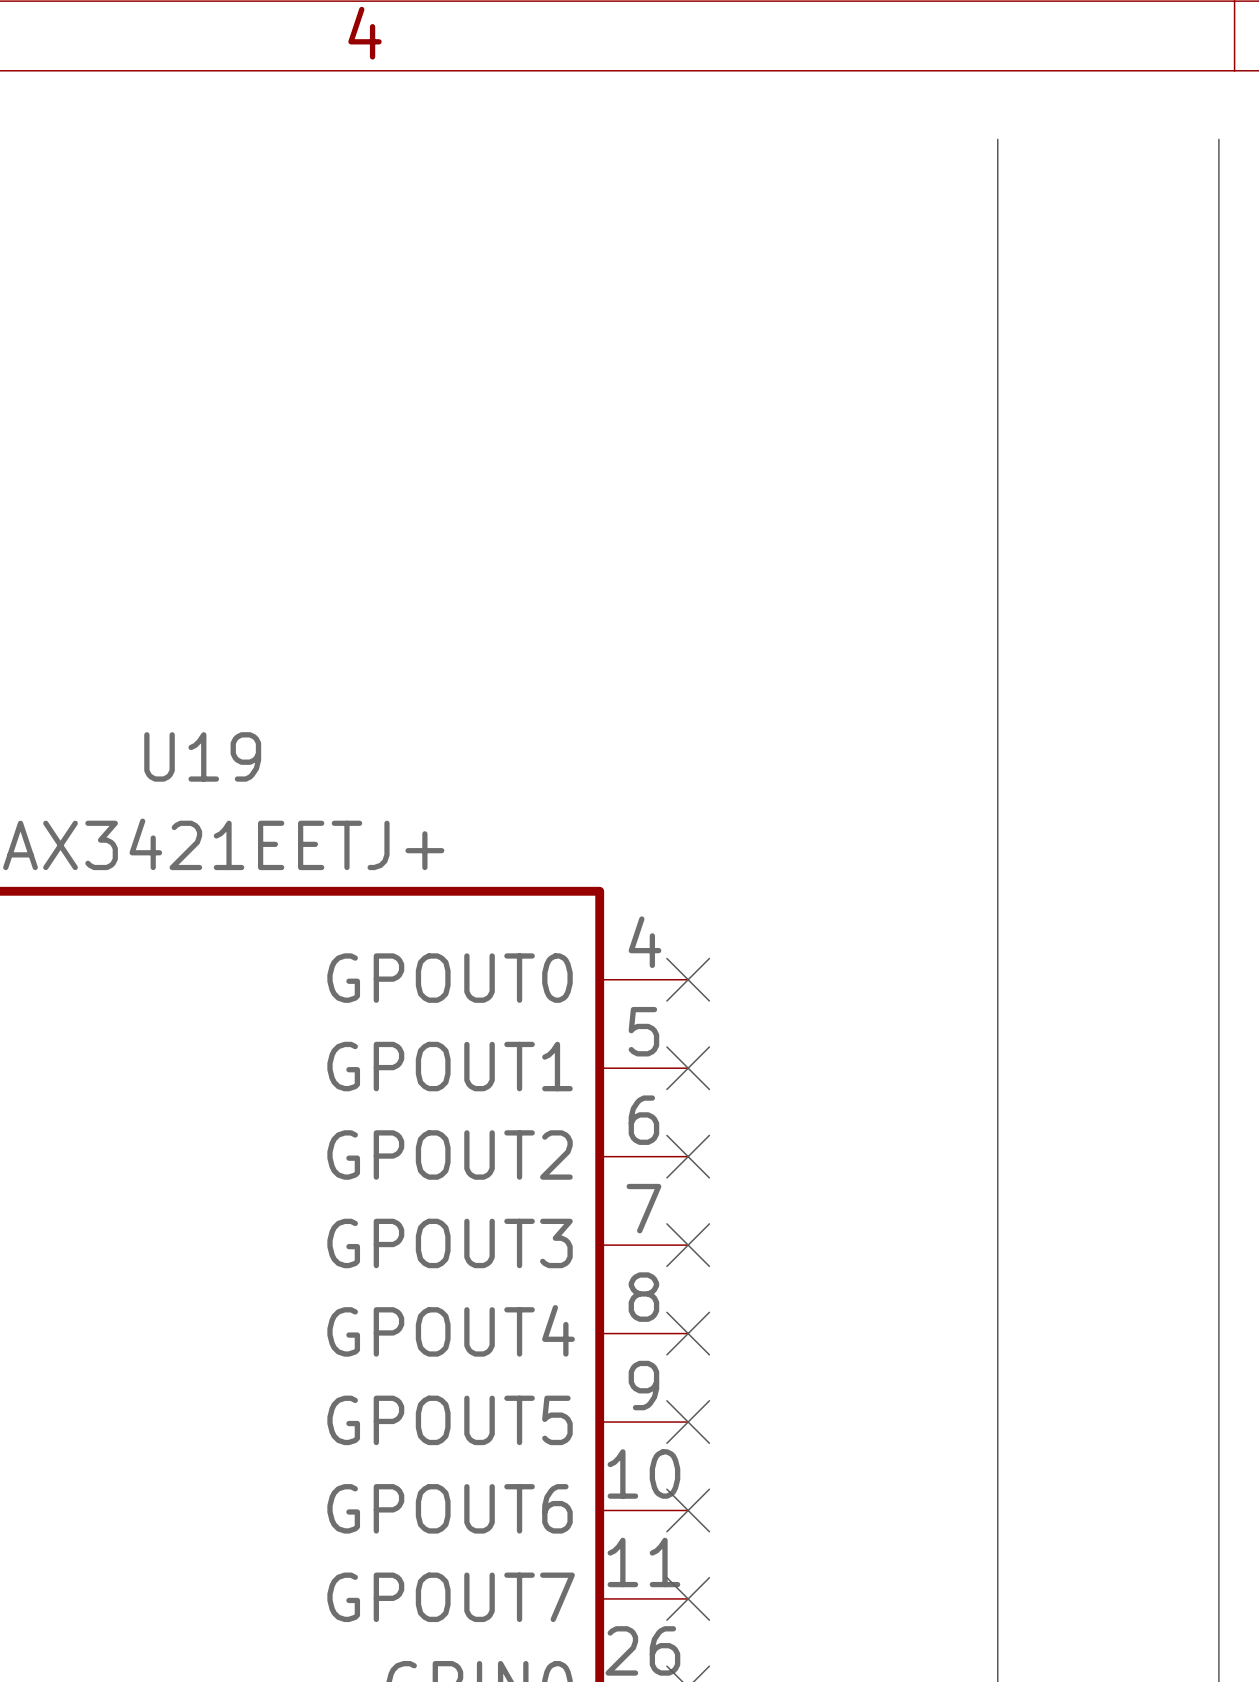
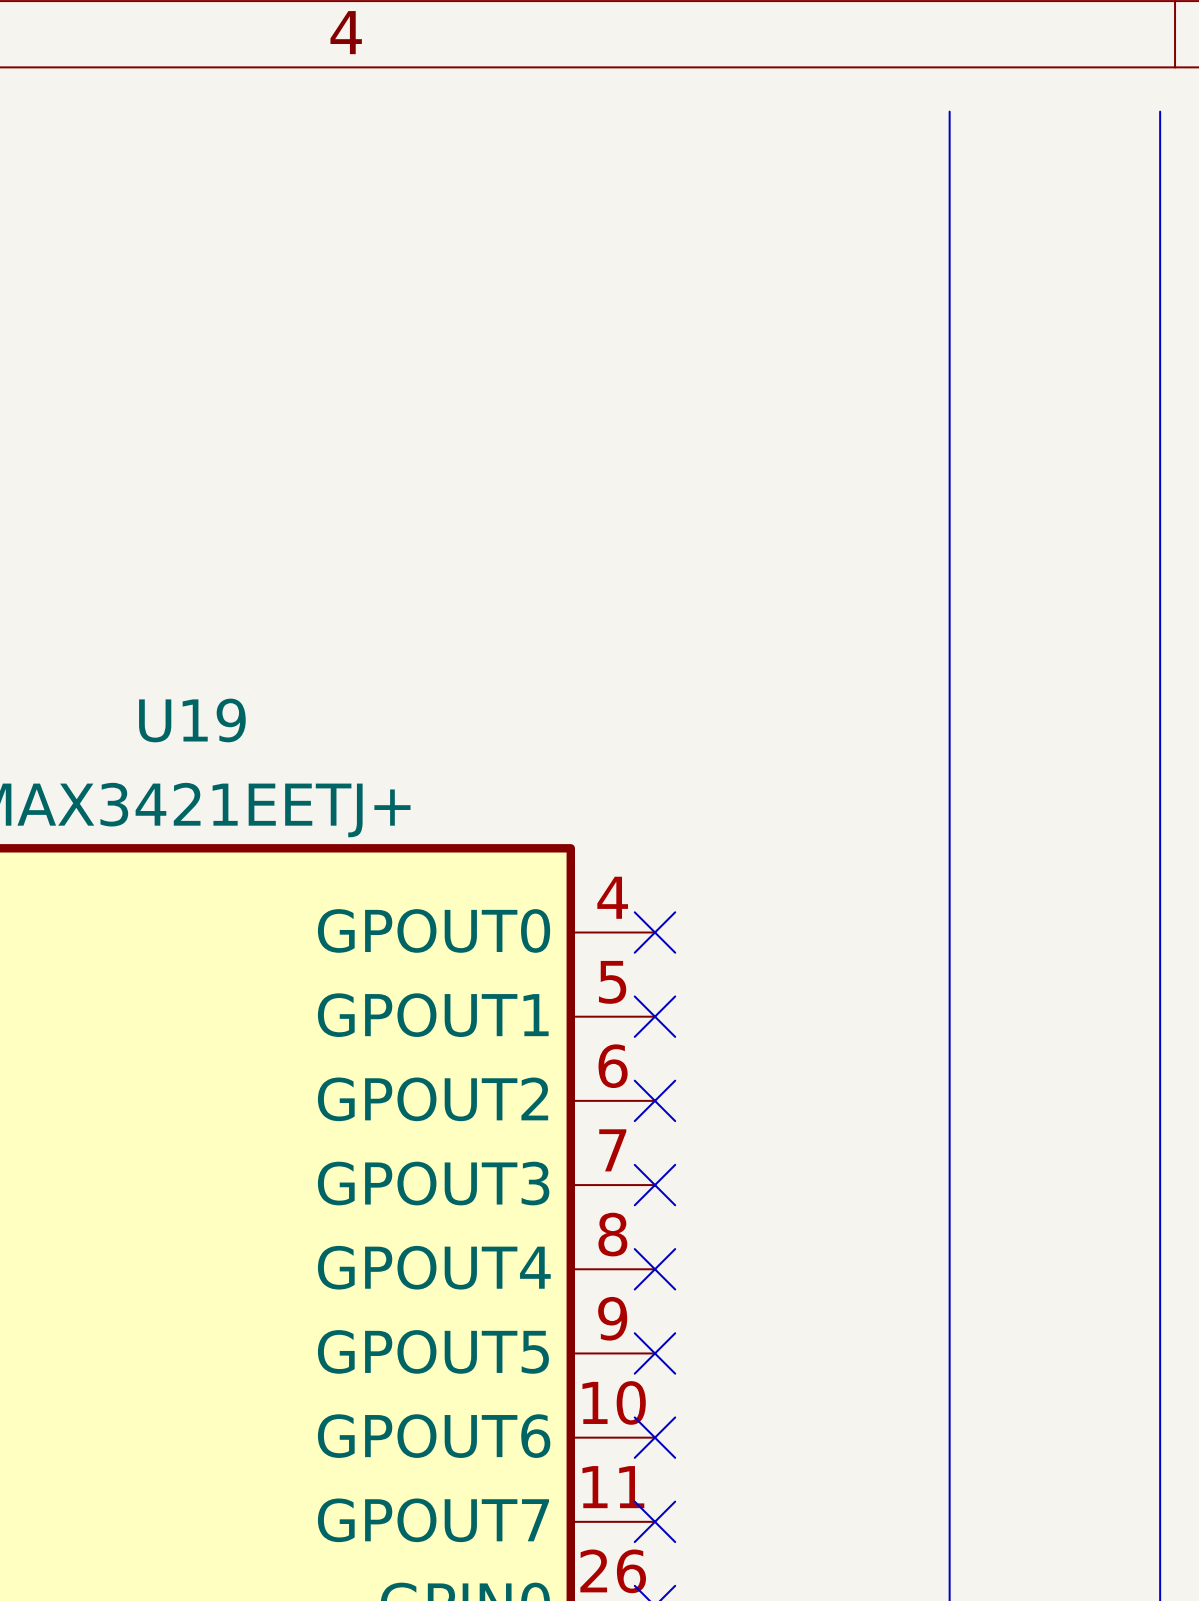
line: none -> (949, 111) (949, 132)
line: none -> (1160, 111) (1160, 132)

